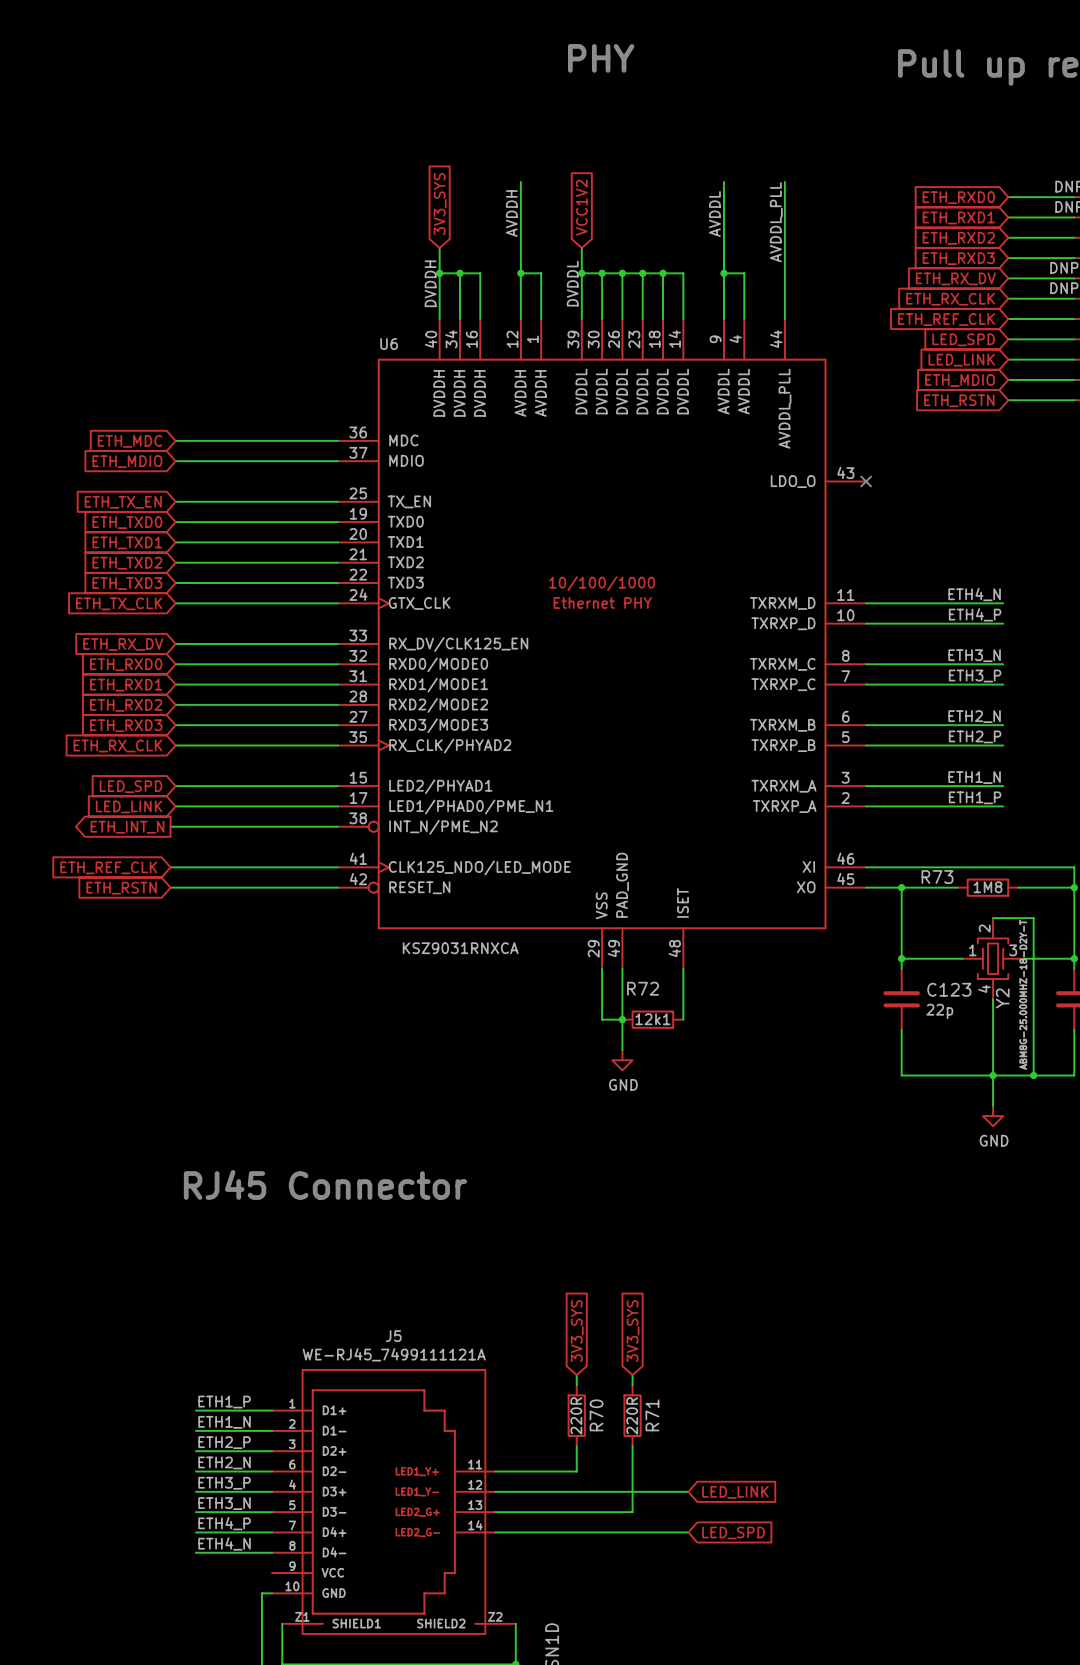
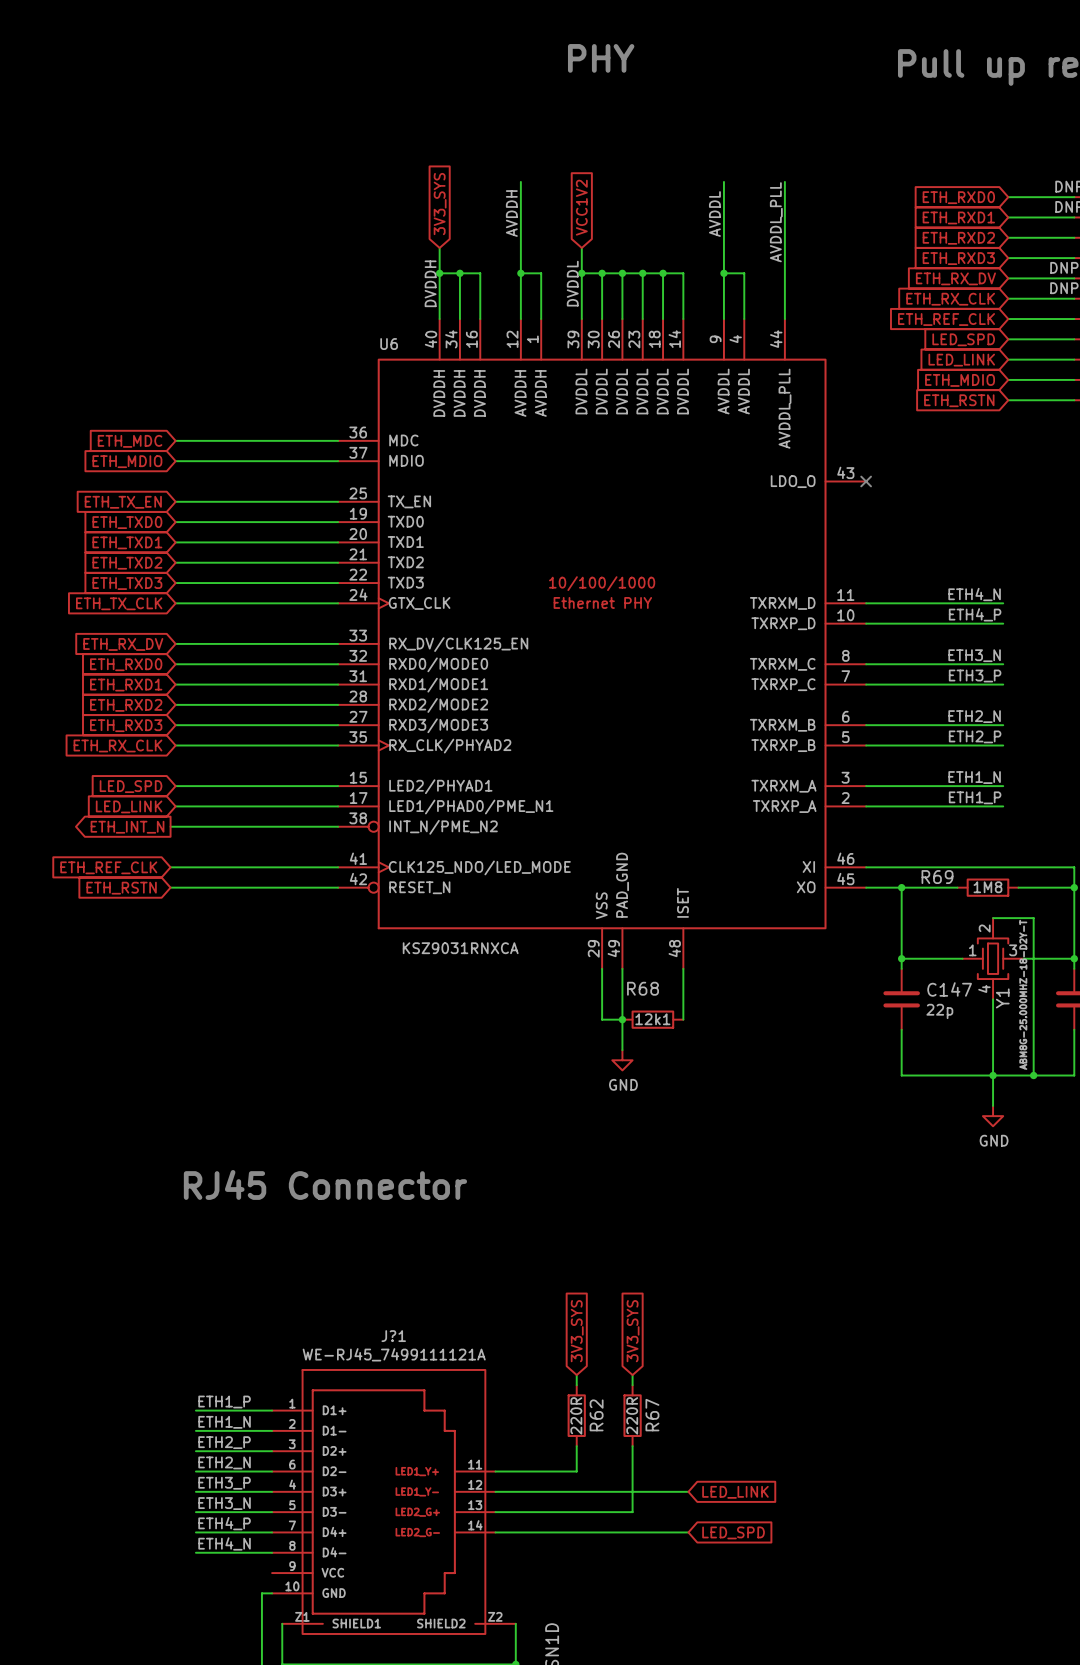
R73 name: R73 (937, 877) -> R69 (937, 877)
R72 name: R72 (643, 988) -> R68 (643, 988)
C123 name: C123 (949, 989) -> C147 (949, 989)
Y2 name: Y2 (1002, 998) -> Y1 (1002, 998)
J5 name: J5 (393, 1336) -> J?1 (393, 1336)
R70 name: R70 (596, 1415) -> R62 (596, 1415)
R71 name: R71 (652, 1415) -> R67 (652, 1415)

